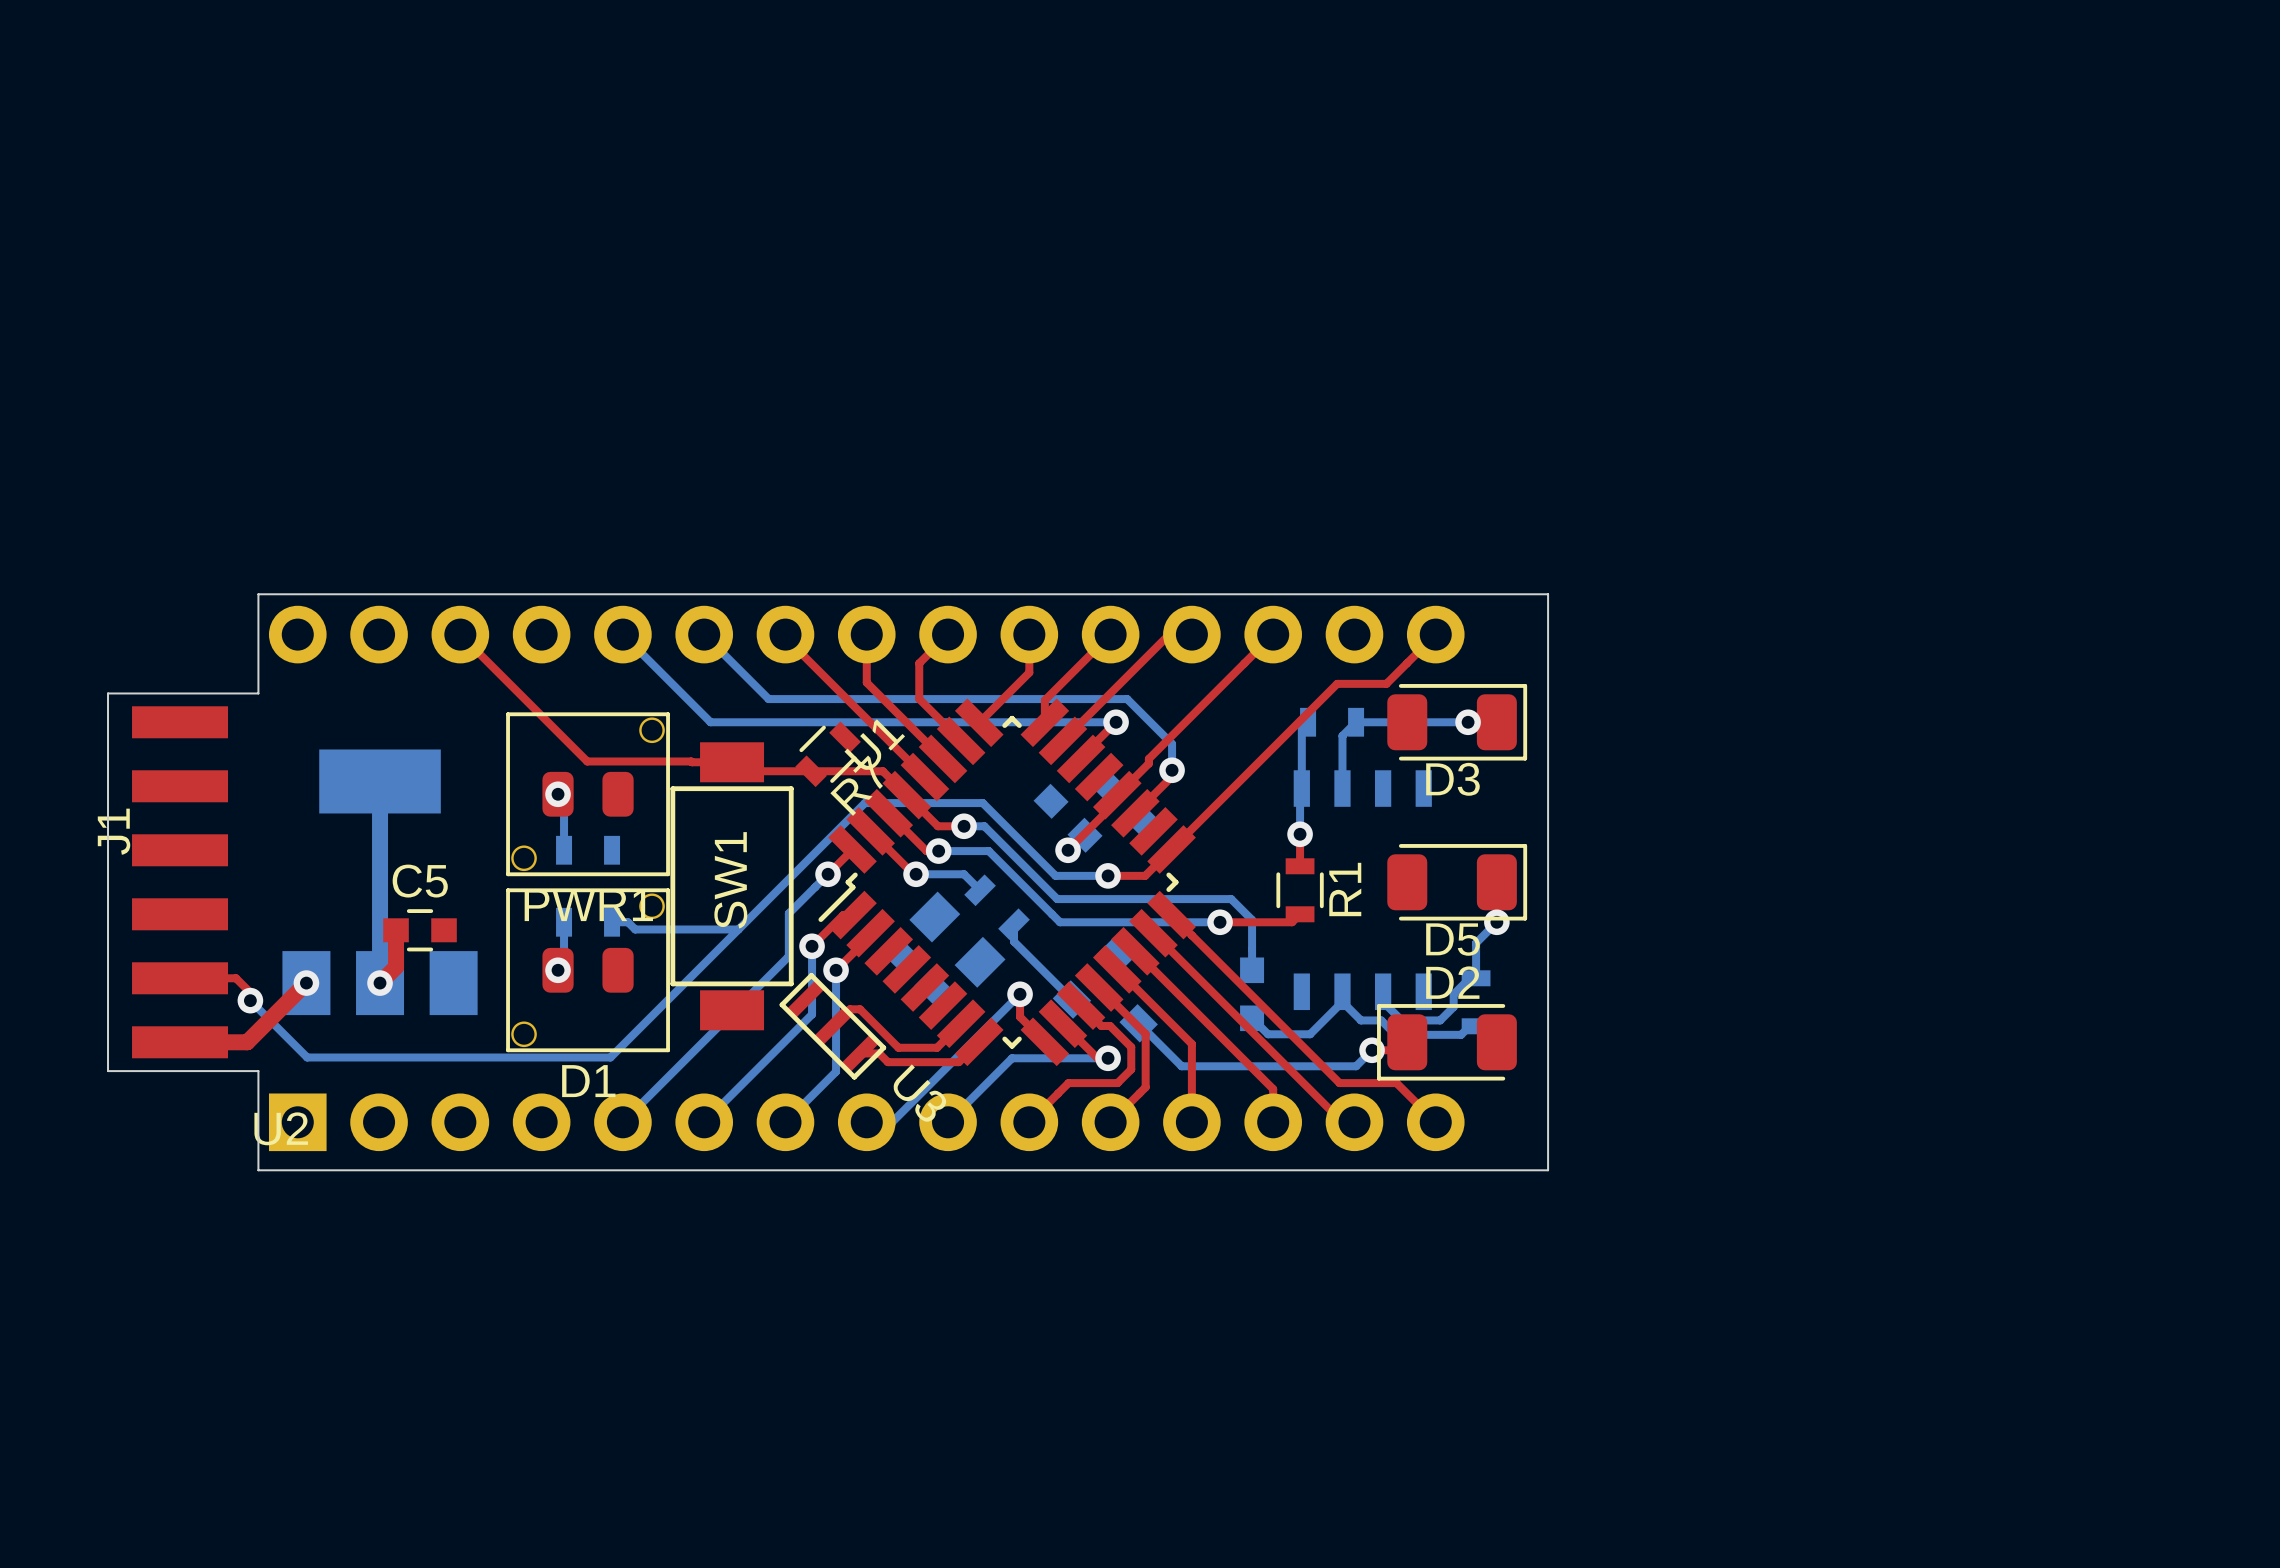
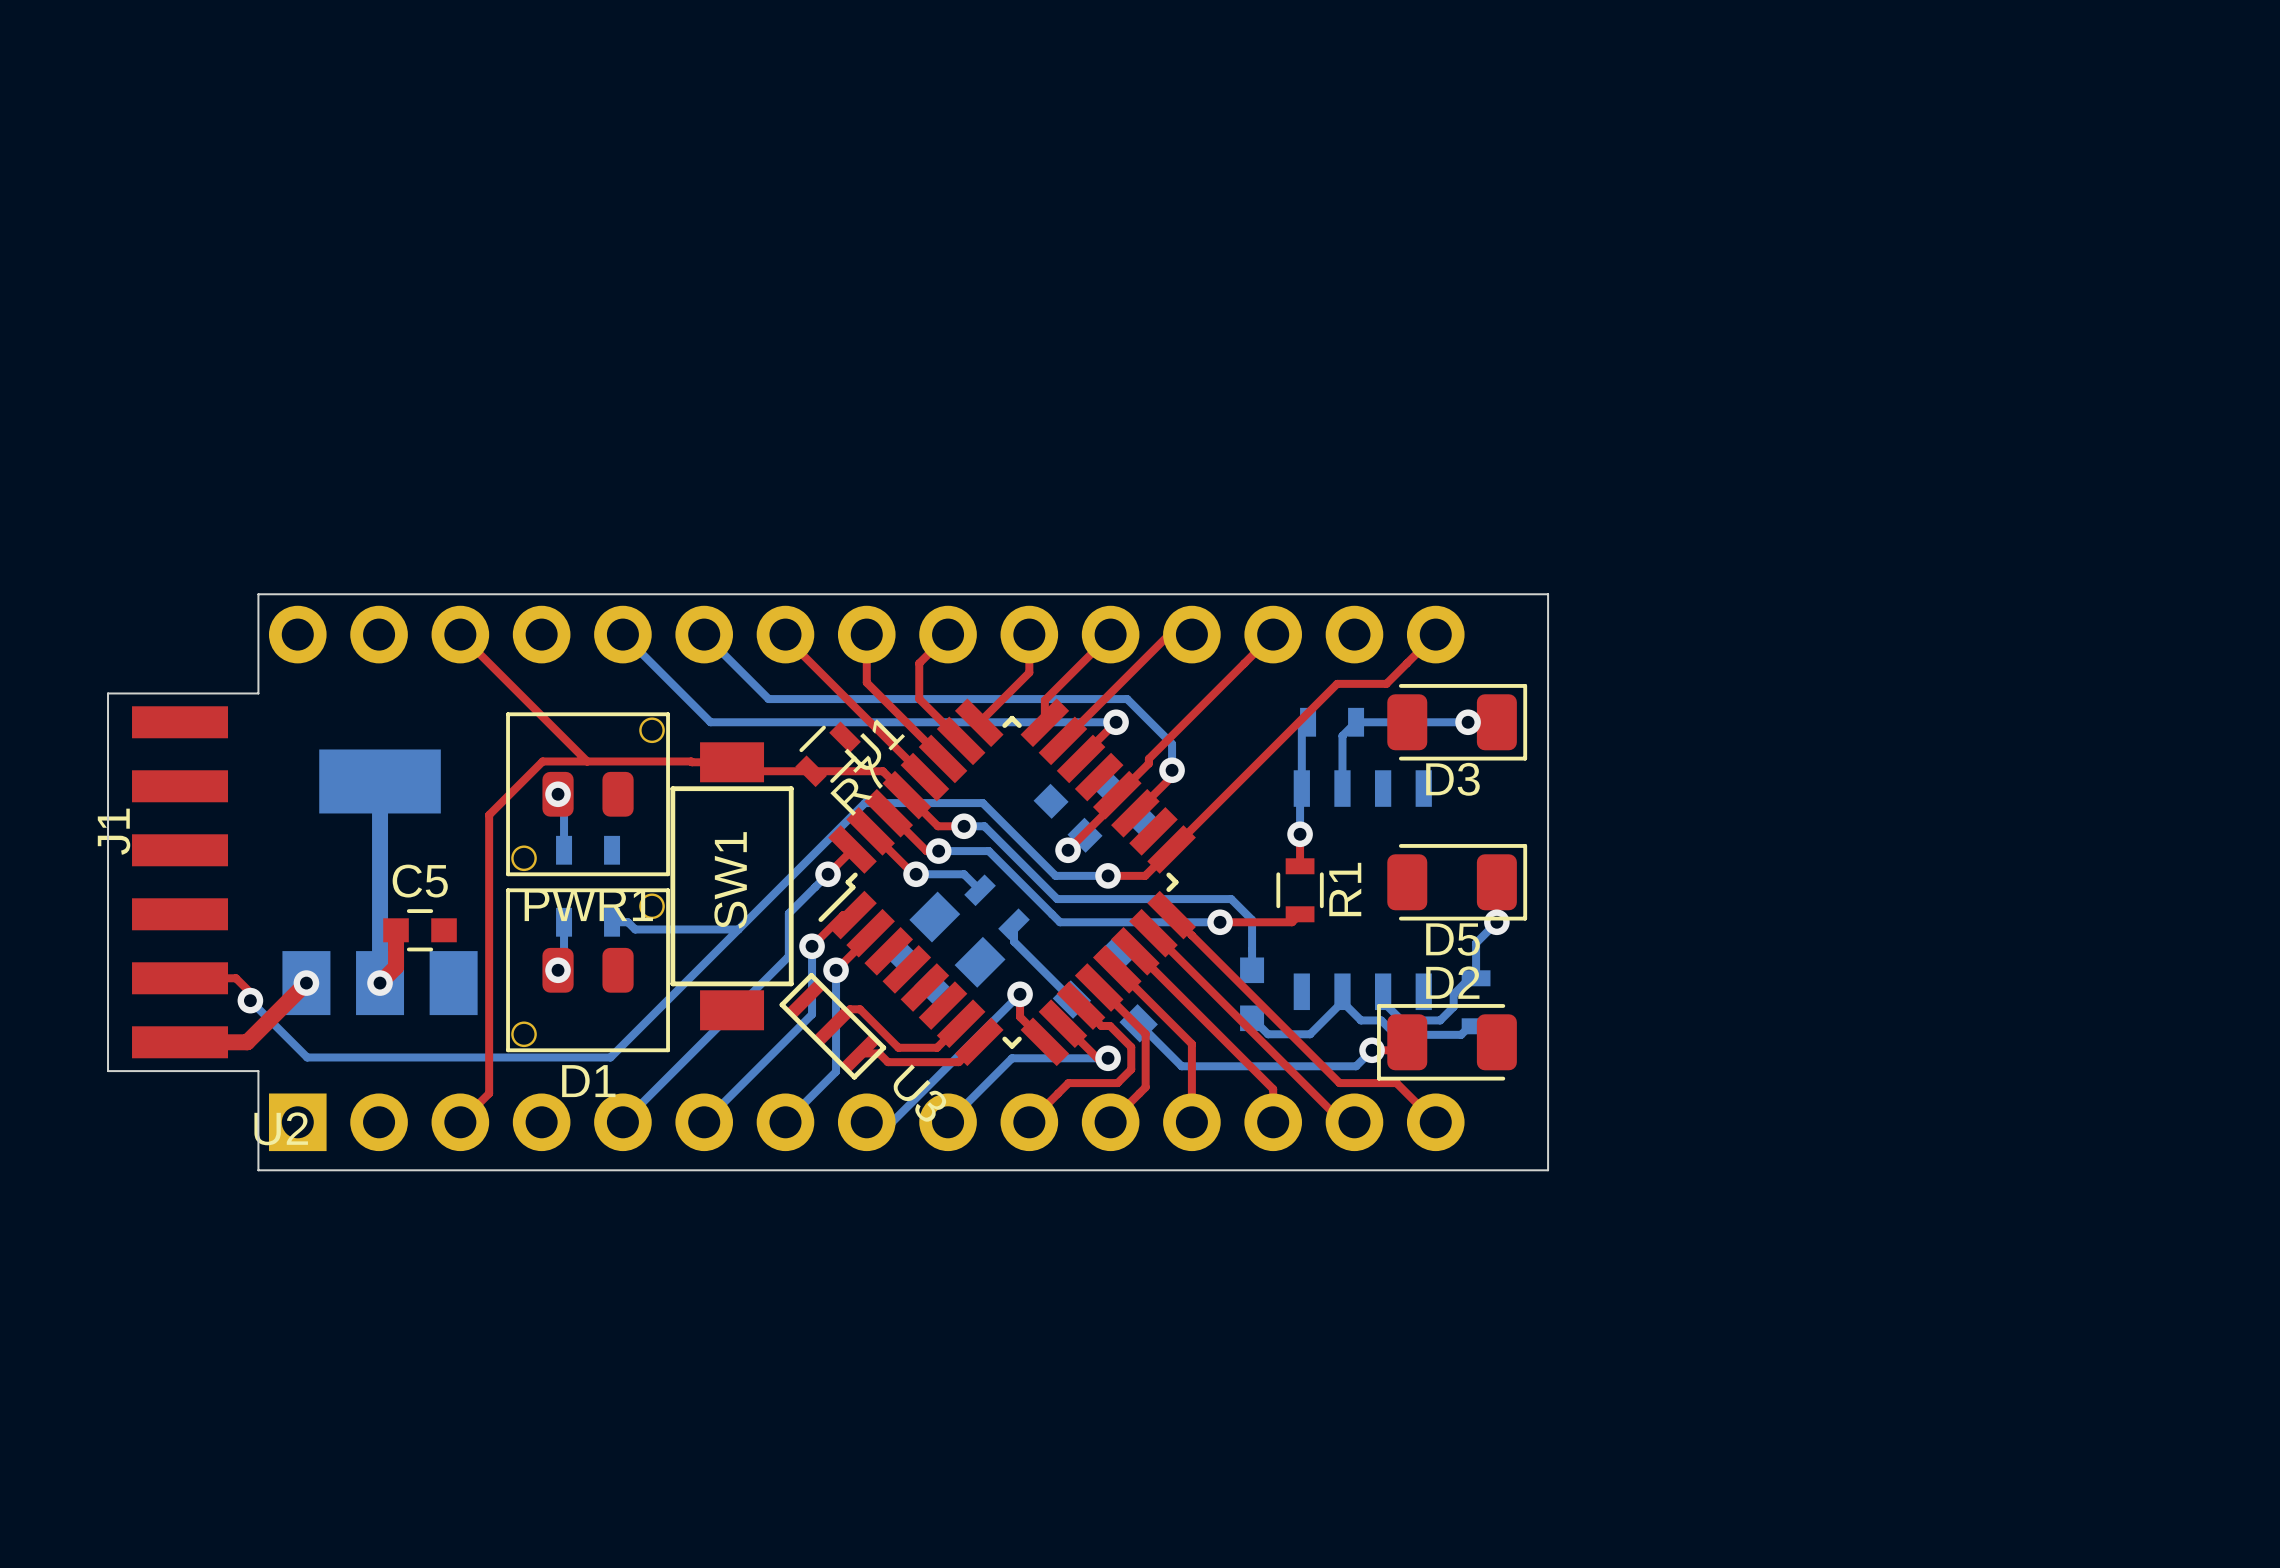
top track: none -> (587, 761) (542, 761) (489, 815) (489, 1093) (460, 1122)

